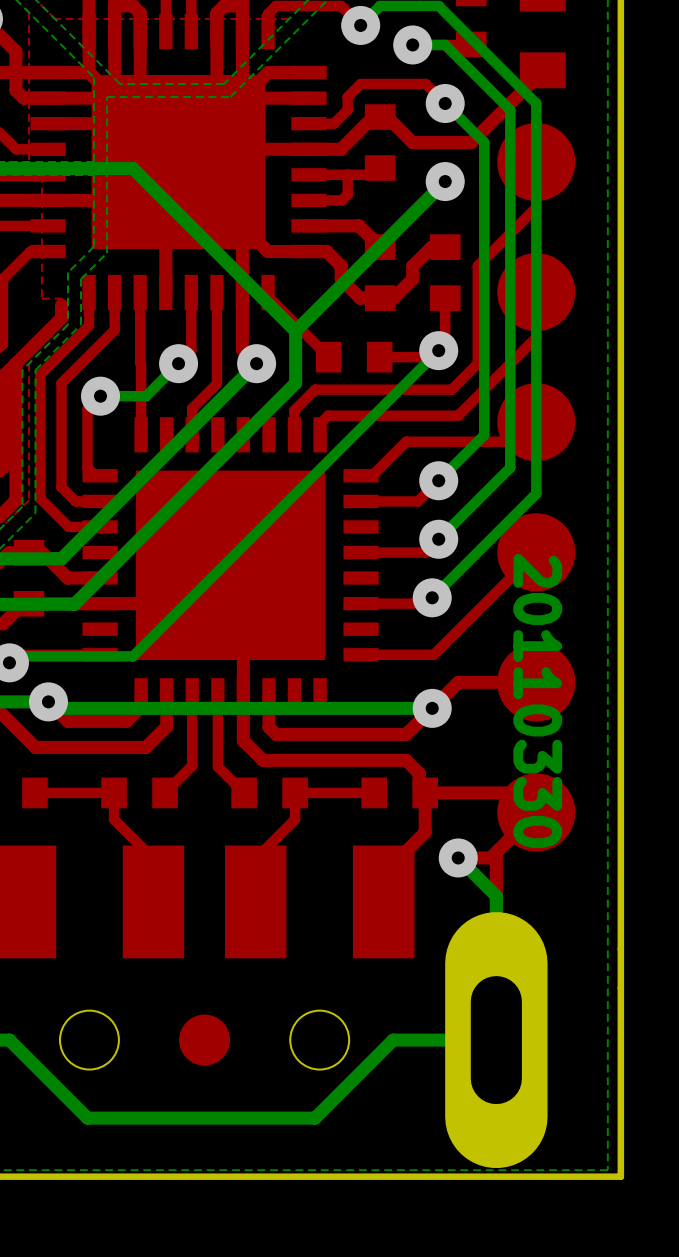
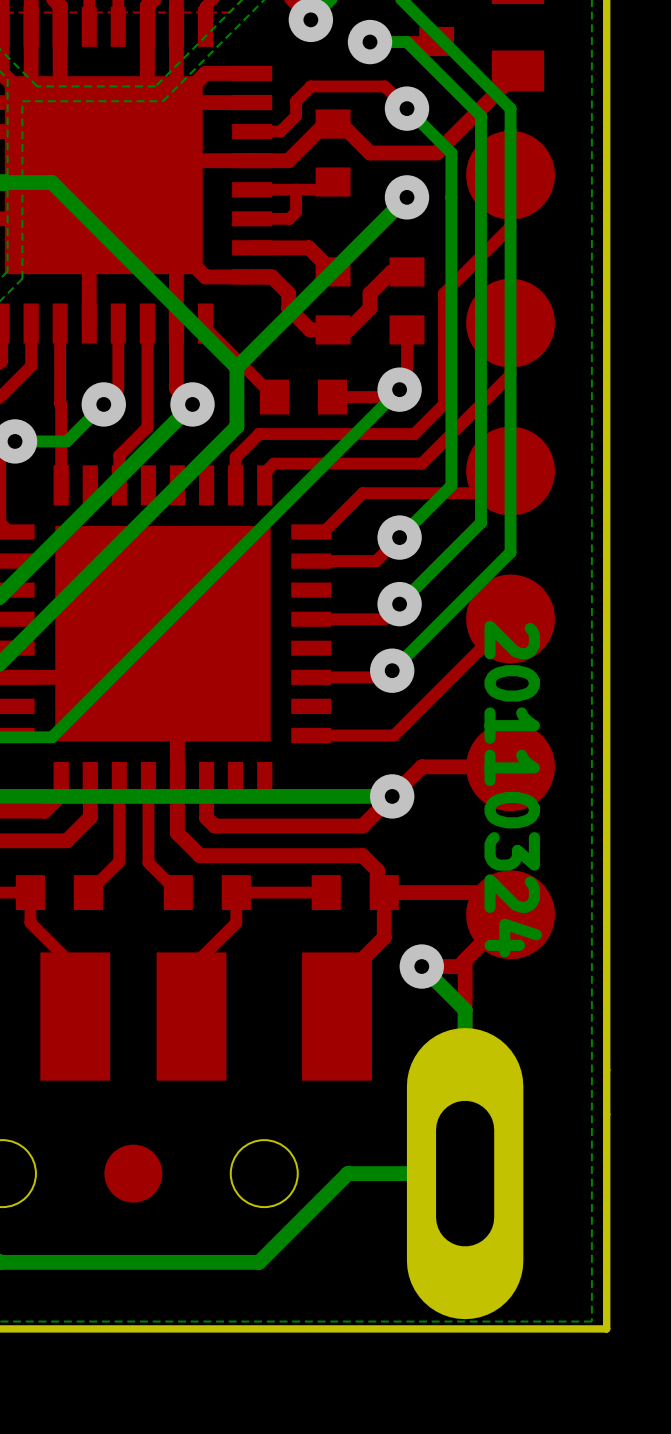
text: 20110330 (537, 700) -> 20110324 (513, 789)

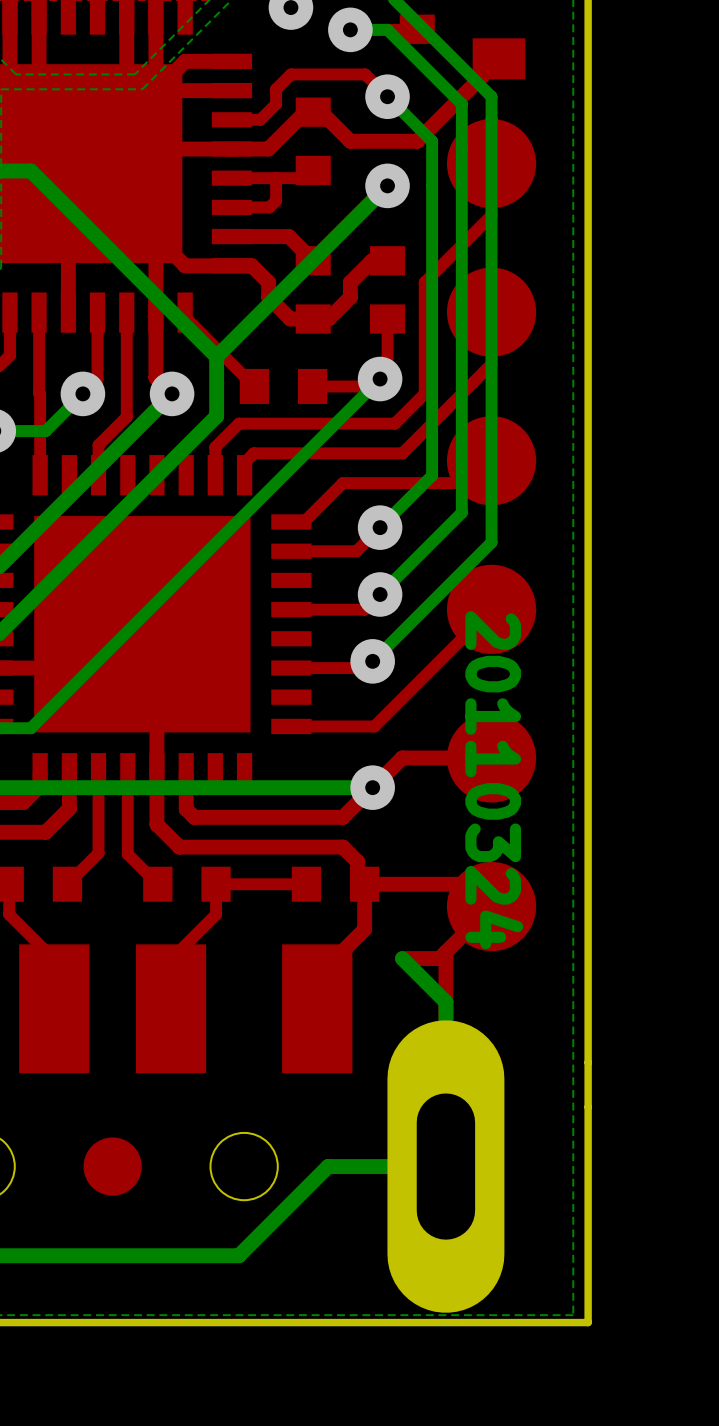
via: (421, 966) -> none

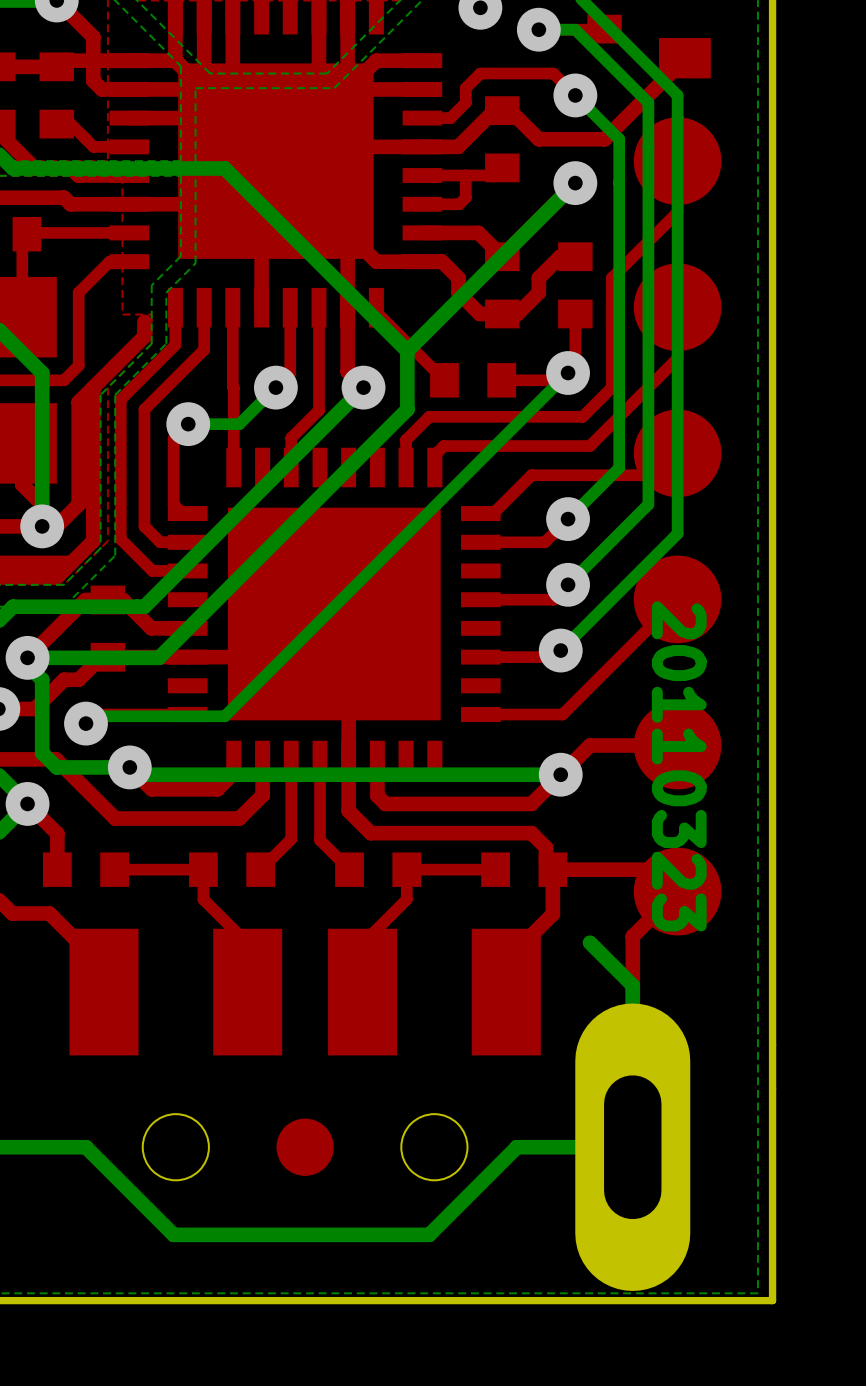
text: 20110324 (494, 780) -> 20110323 (679, 766)
top track: (445, 952) (439, 958) (402, 958) -> none

